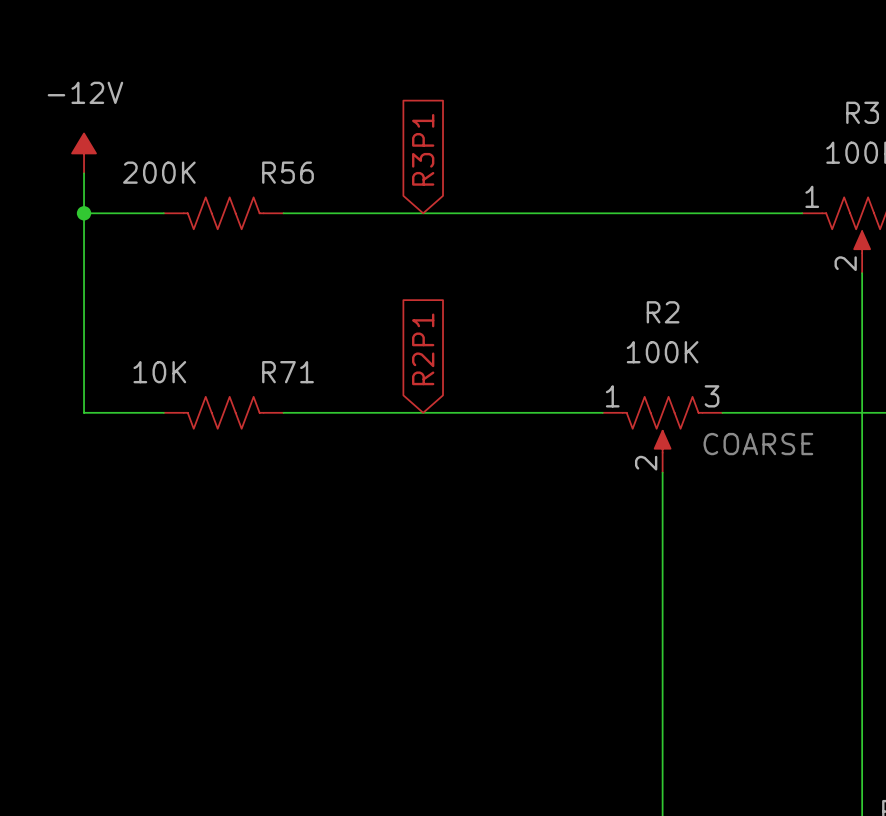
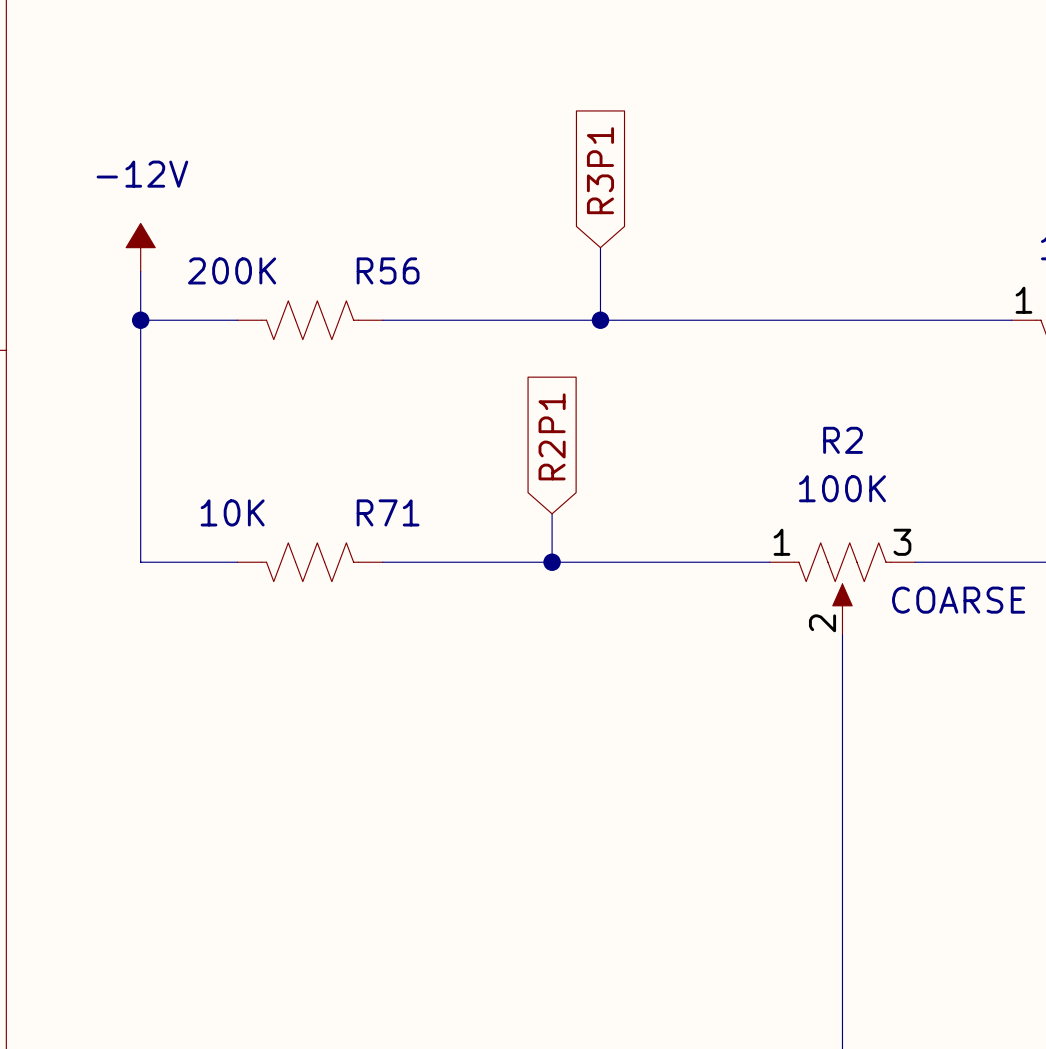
global label position: R3P1 (423, 149) -> R3P1 (600, 170)
wire: none -> (600, 247) (600, 320)
junction: none -> (600, 320)
global label position: R2P1 (423, 349) -> R2P1 (552, 436)
wire: none -> (552, 513) (552, 562)
junction: none -> (552, 562)

